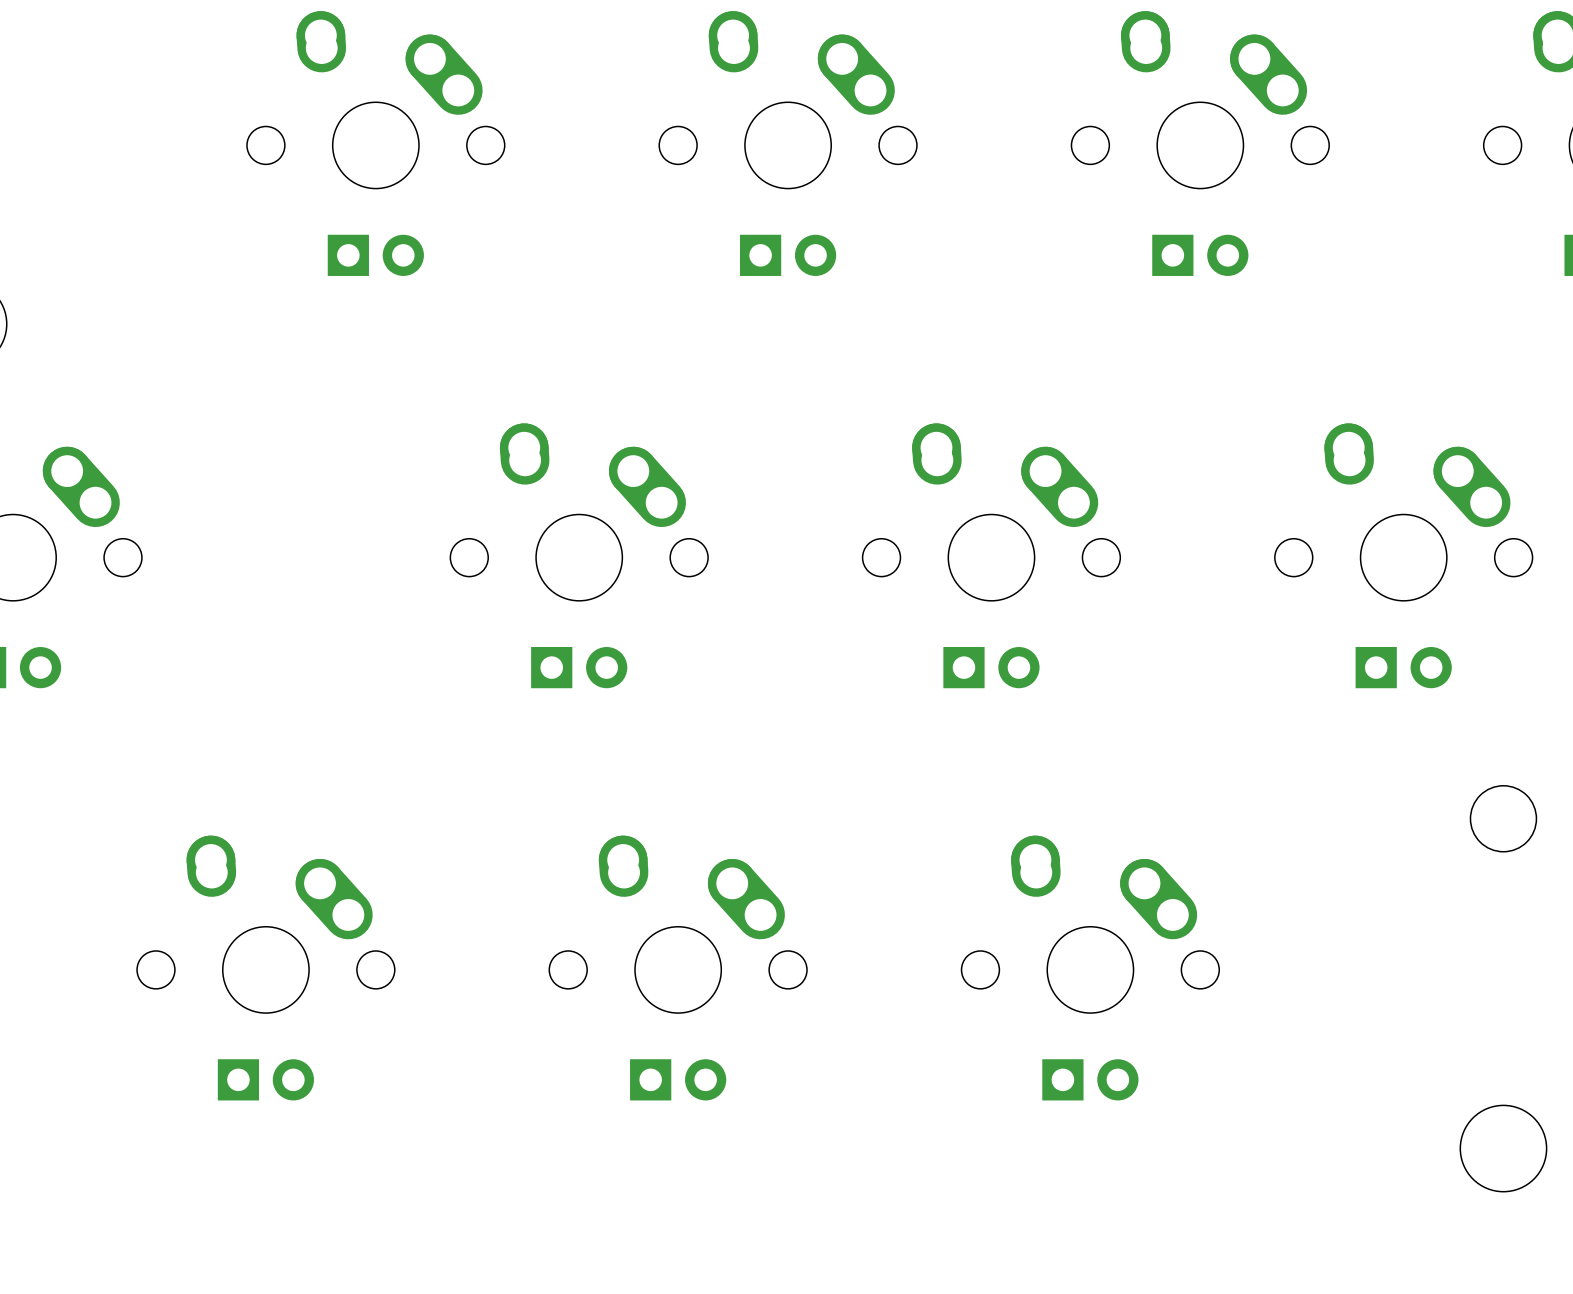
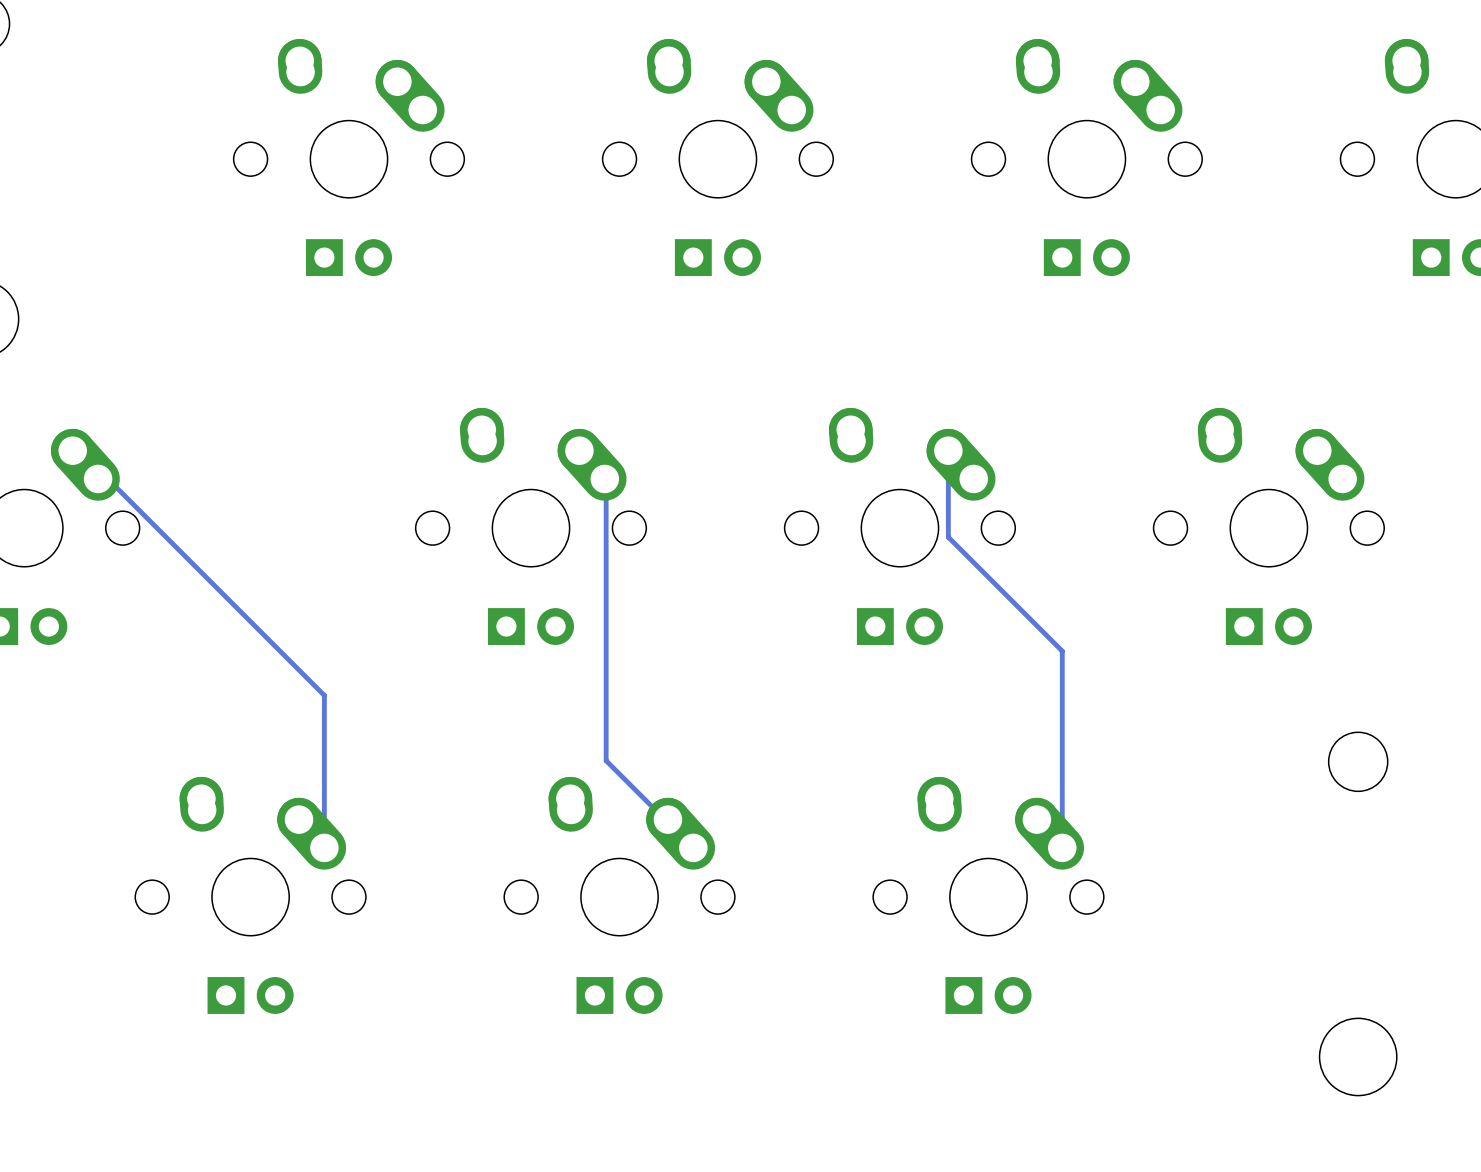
track: none -> (948, 450) (948, 537) (1062, 651) (1062, 847)
track: none -> (98, 478) (107, 478) (324, 695) (324, 847)
track: none -> (604, 478) (606, 760) (693, 847)

